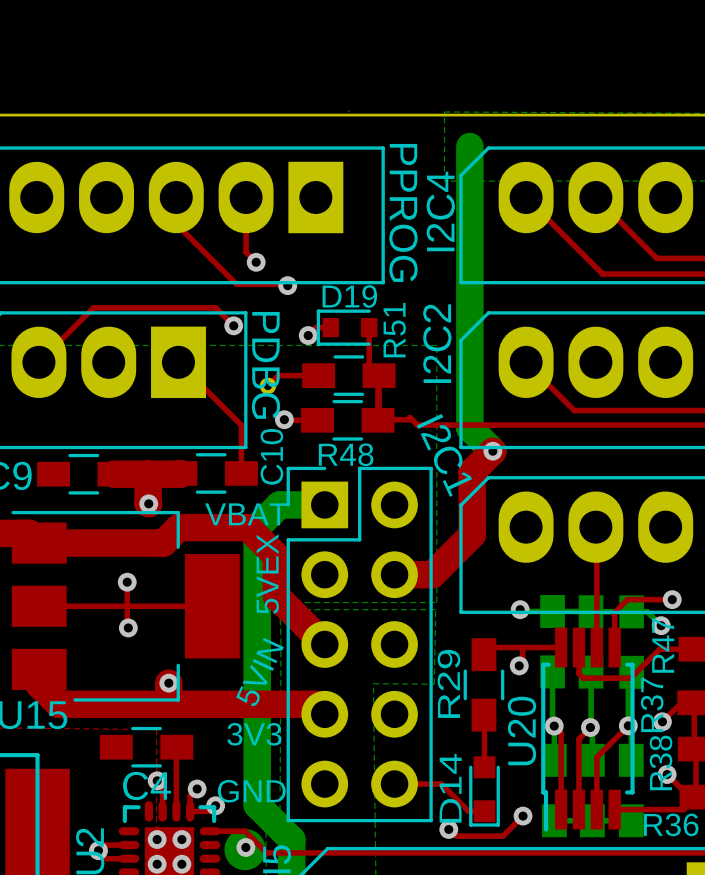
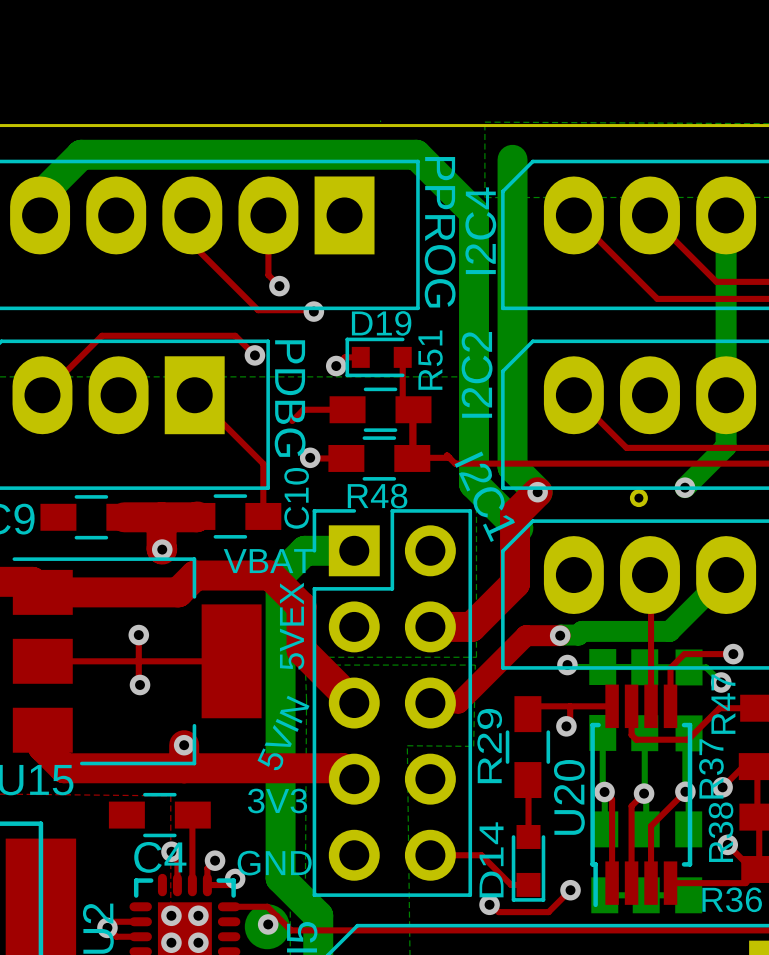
bottom track: none -> (40, 215) (40, 195) (81, 154) (416, 154) (474, 212) (474, 483) (518, 528)
bottom track: none -> (726, 215) (726, 446) (685, 487)
part: (267, 385) -> none
via: none -> (685, 487)
part: none -> (638, 498)
bottom track: none -> (726, 575) (669, 631) (582, 631) (578, 635) (560, 635)
top track: none -> (560, 635) (526, 635) (458, 703) (430, 703)
via: none -> (560, 635)

